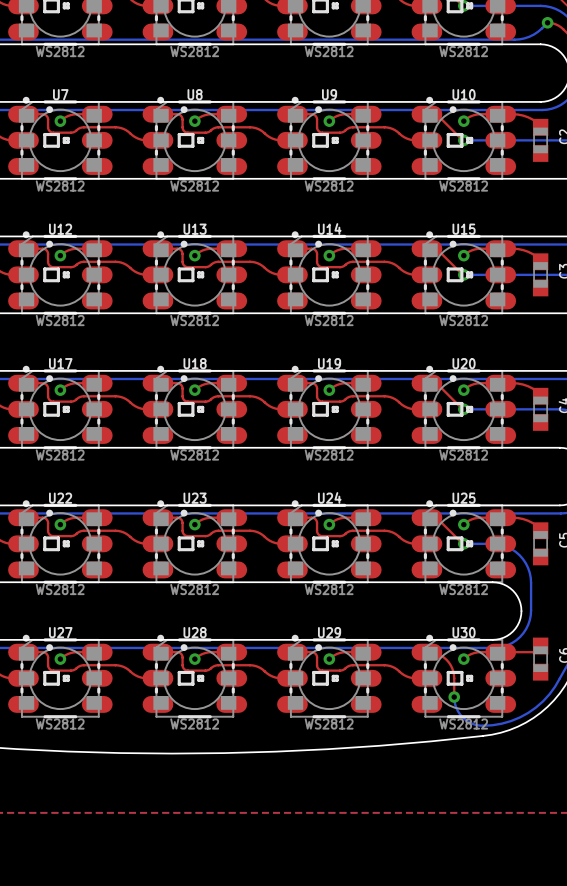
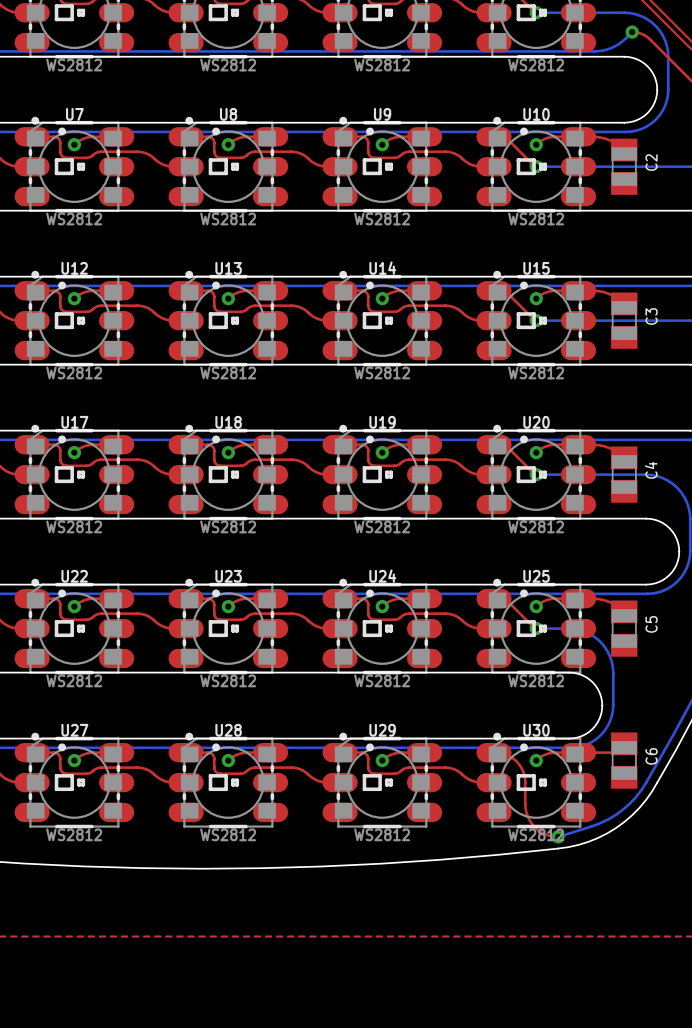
C2 footprint: [532, 118, 549, 162] -> [611, 138, 638, 195]
C3 footprint: [532, 253, 549, 297] -> [611, 292, 638, 349]
C4 footprint: [532, 387, 549, 431] -> [611, 446, 638, 503]
C5 footprint: [532, 522, 549, 566] -> [611, 600, 638, 657]
C6 footprint: [532, 637, 549, 681] -> [611, 732, 638, 789]
bottom track: (559, 678) (549, 694) (535, 707) (519, 717) (501, 723) (482, 725) (468, 721) (458, 711) (454, 697) -> (646, 782) (629, 803) (615, 815) (599, 823) (558, 836)
top track: none -> (525, 804) (527, 816) (534, 827) (545, 834) (558, 836)
via position: (454, 697) -> (558, 836)

